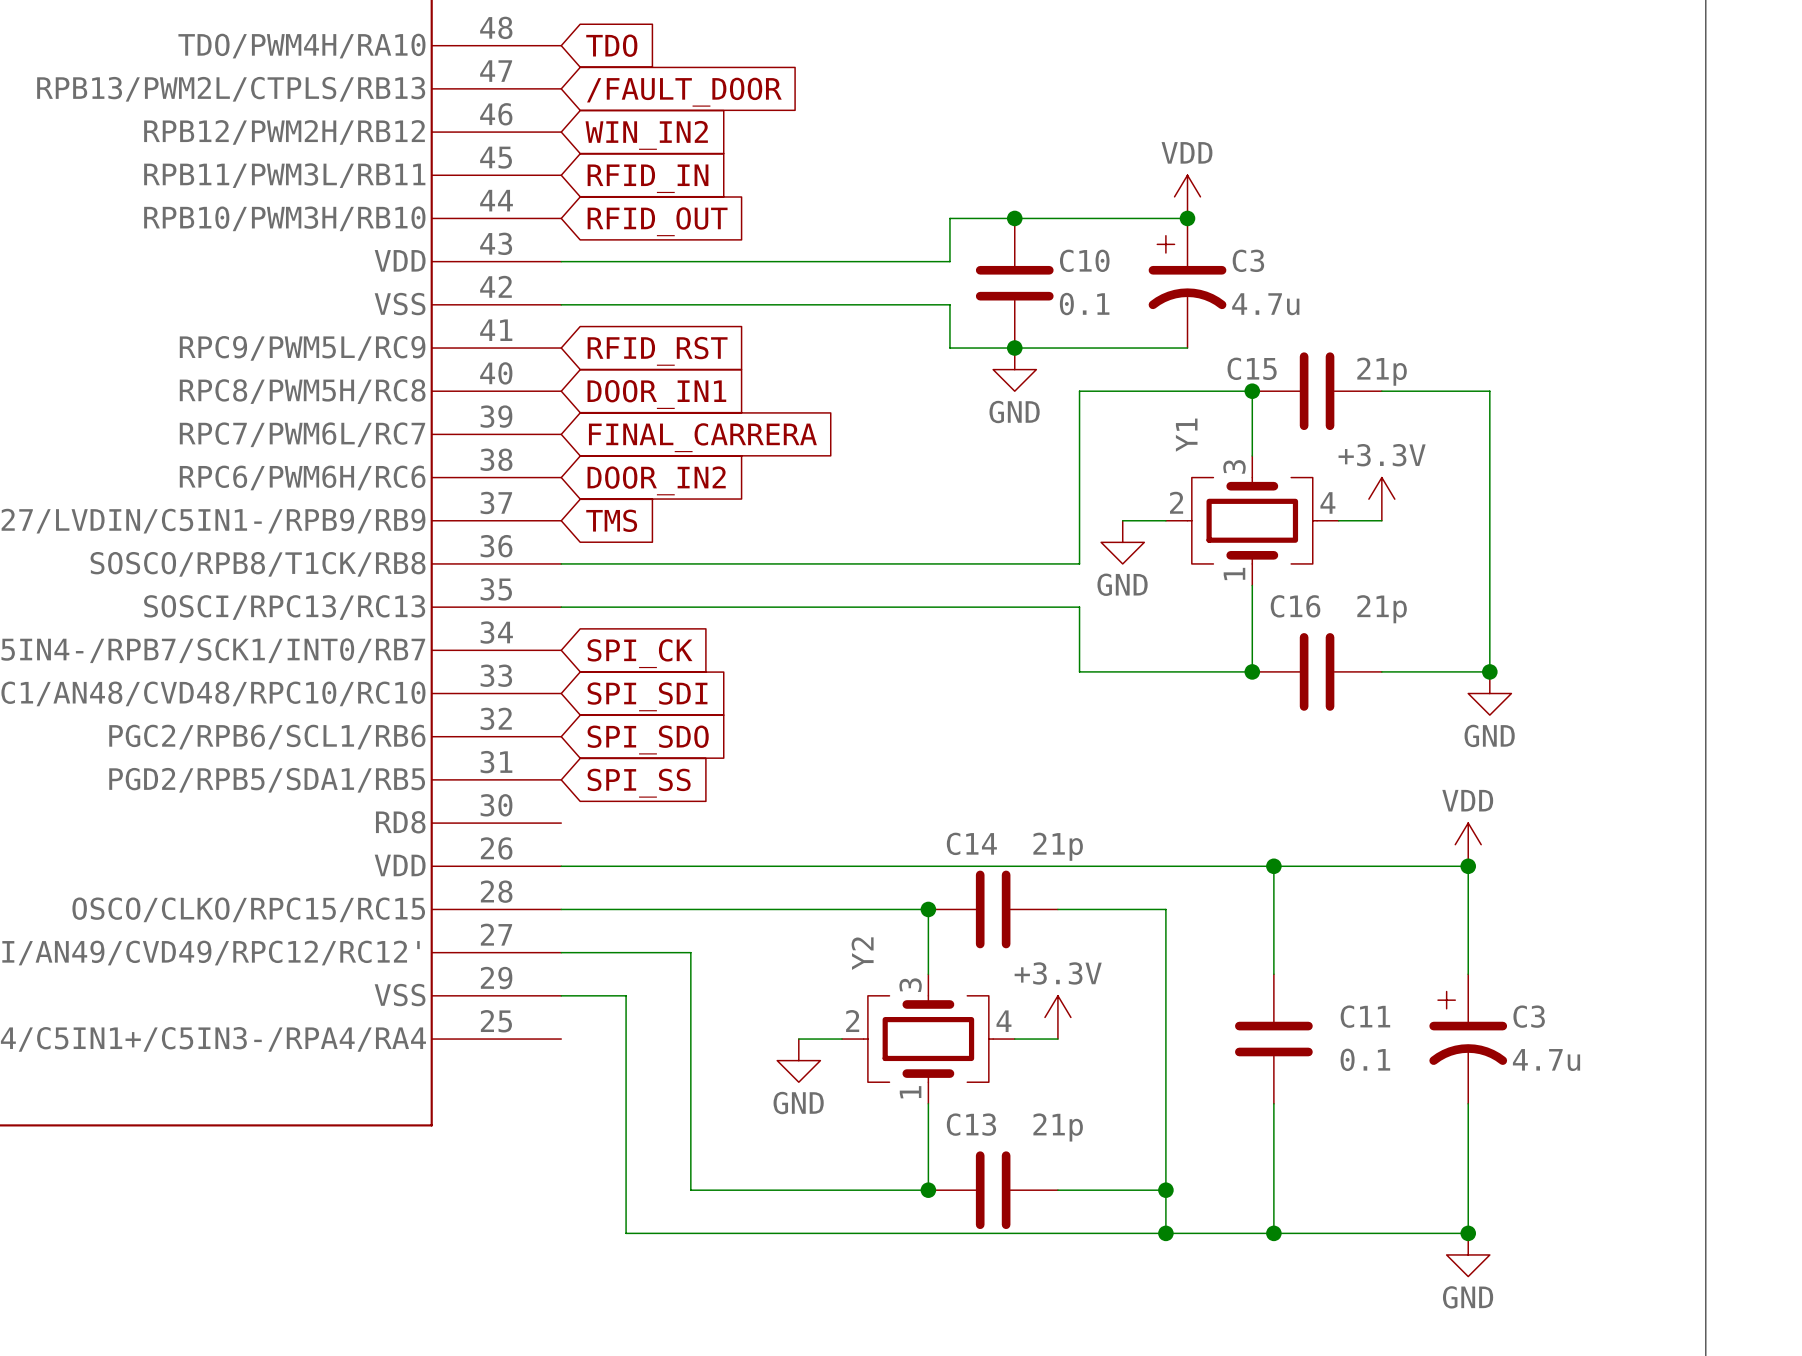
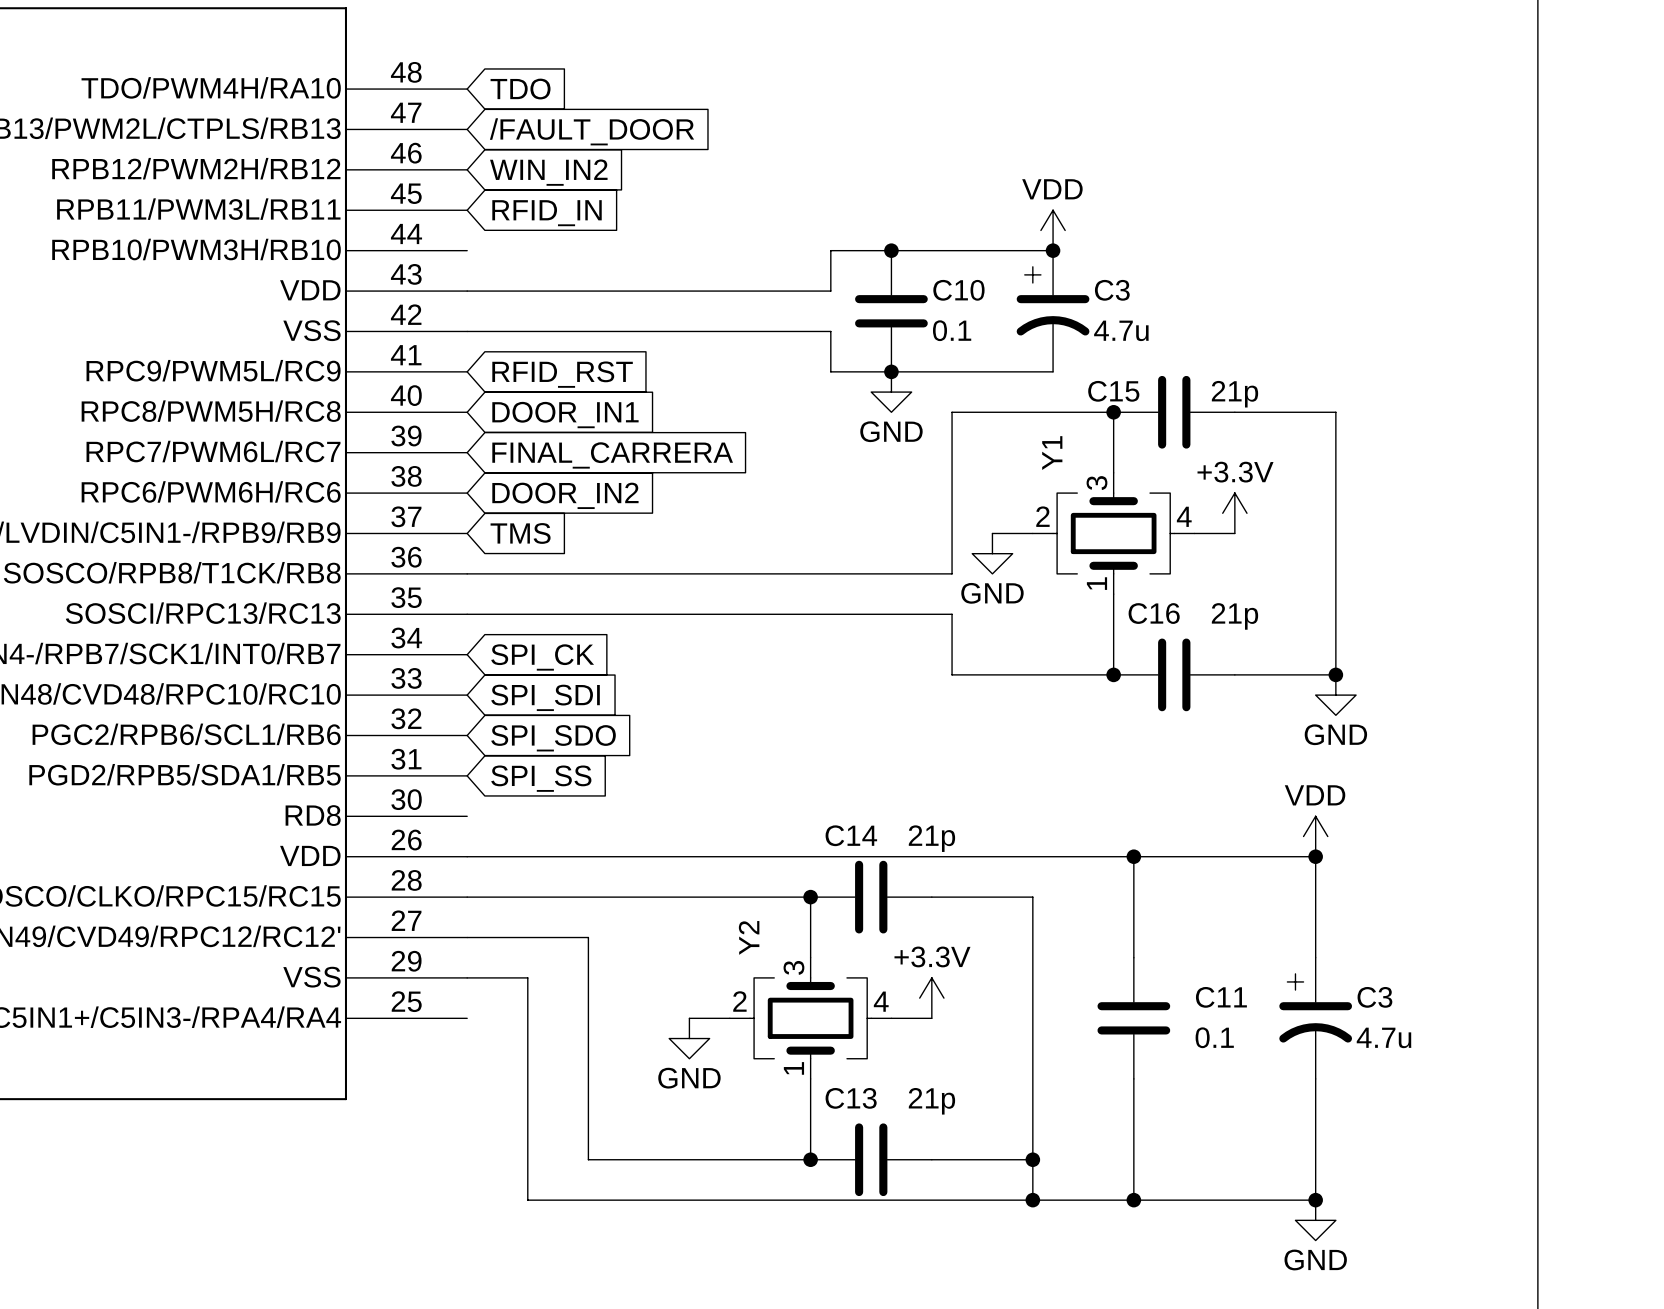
global label: RFID_OUT (657, 221) -> none

